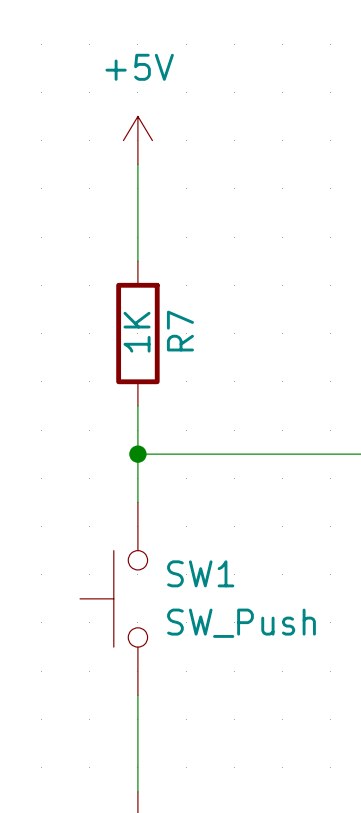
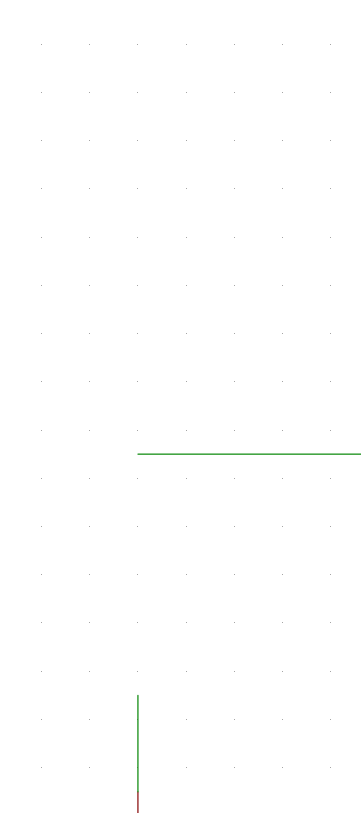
power symbol: +5V (137, 140) -> none
wire: (137, 164) (137, 261) -> none
R7: 1K (137, 333) -> none
wire: (137, 405) (137, 502) -> none
junction: (137, 454) -> none
SW1: SW_Push (113, 598) -> none

